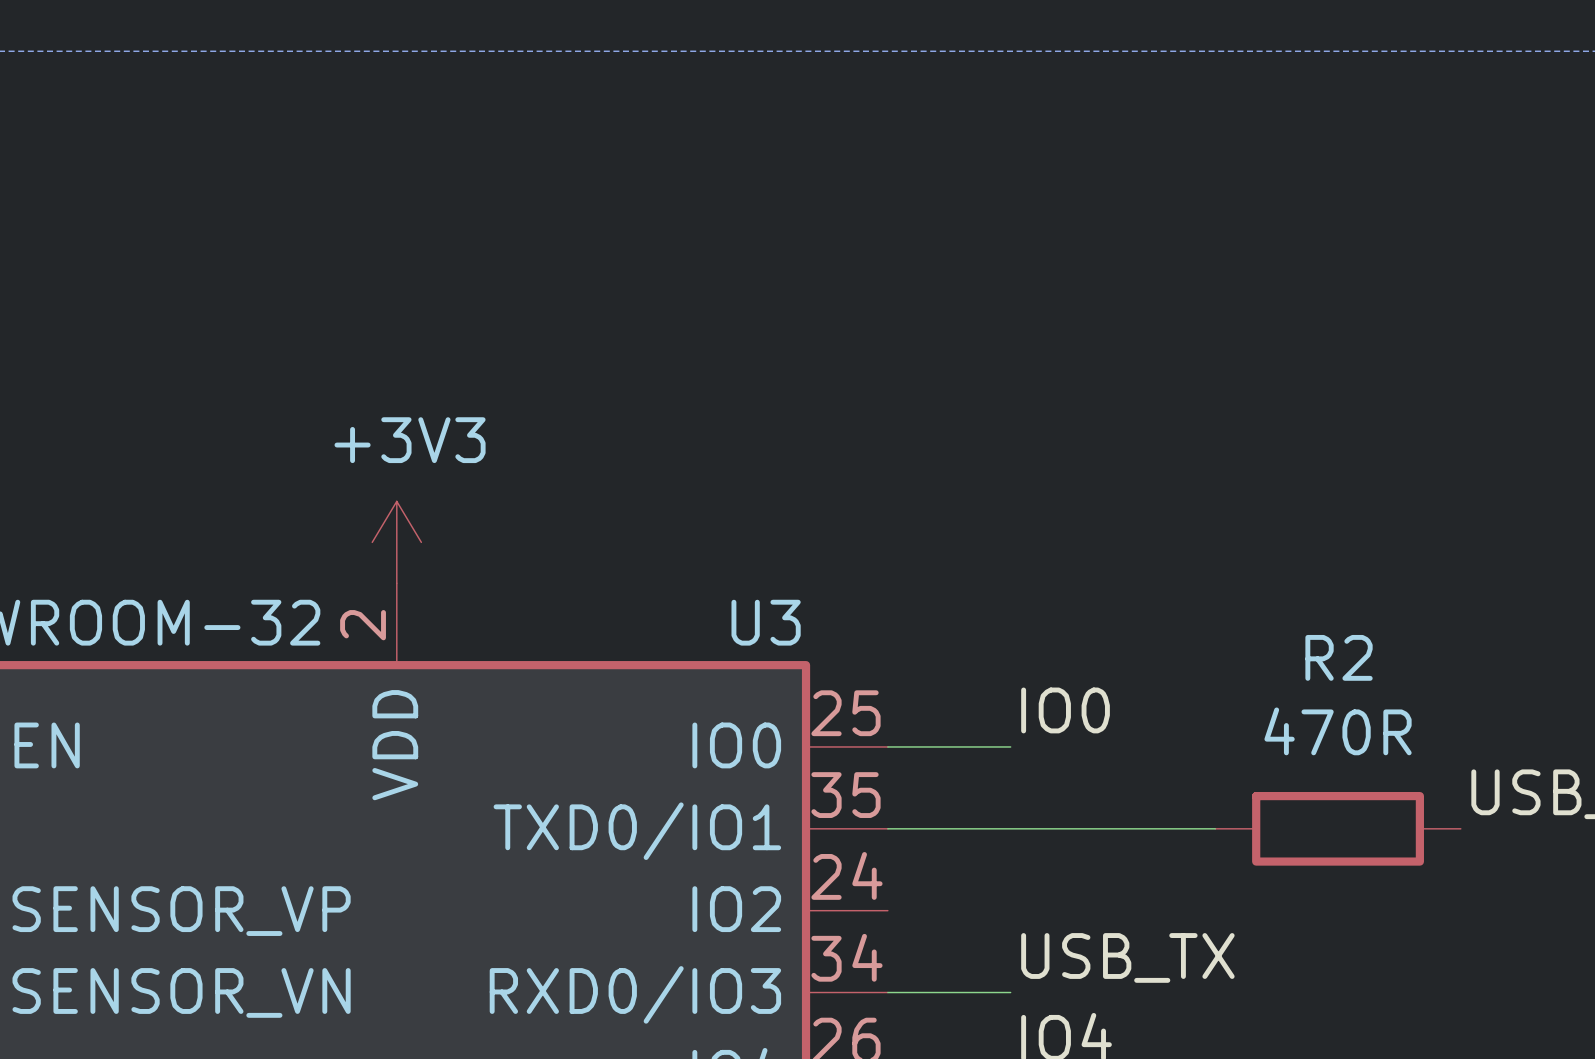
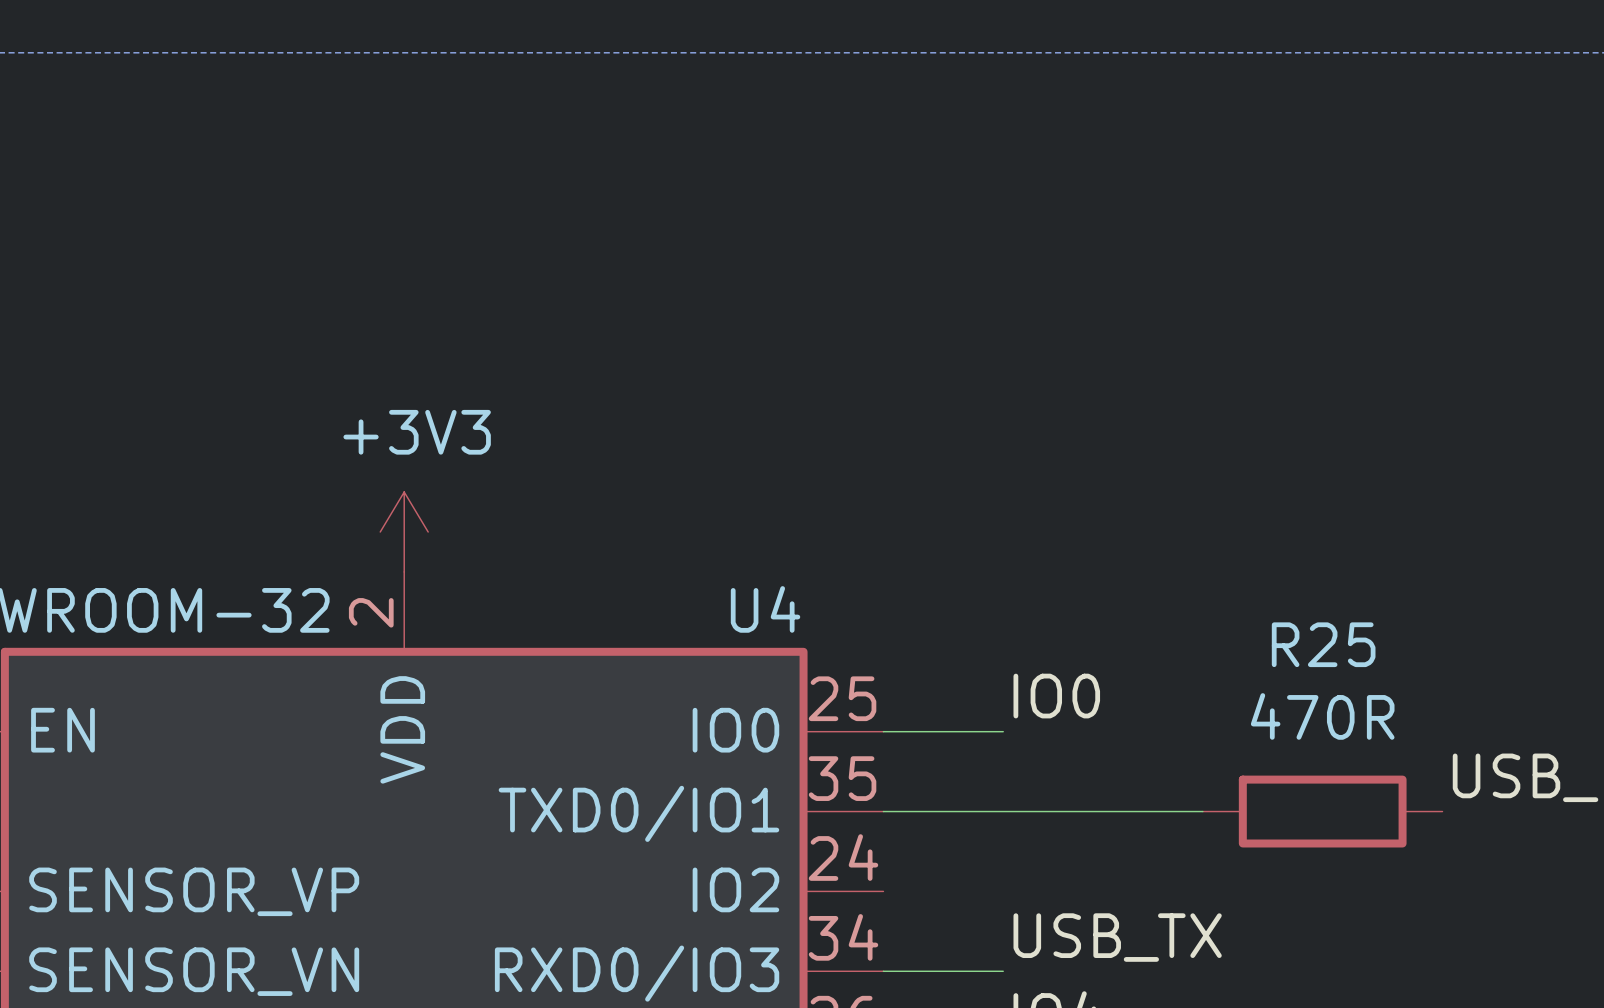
U3 name: U3 (766, 622) -> U4 (765, 609)
R2 name: R2 (1339, 657) -> R25 (1323, 644)

